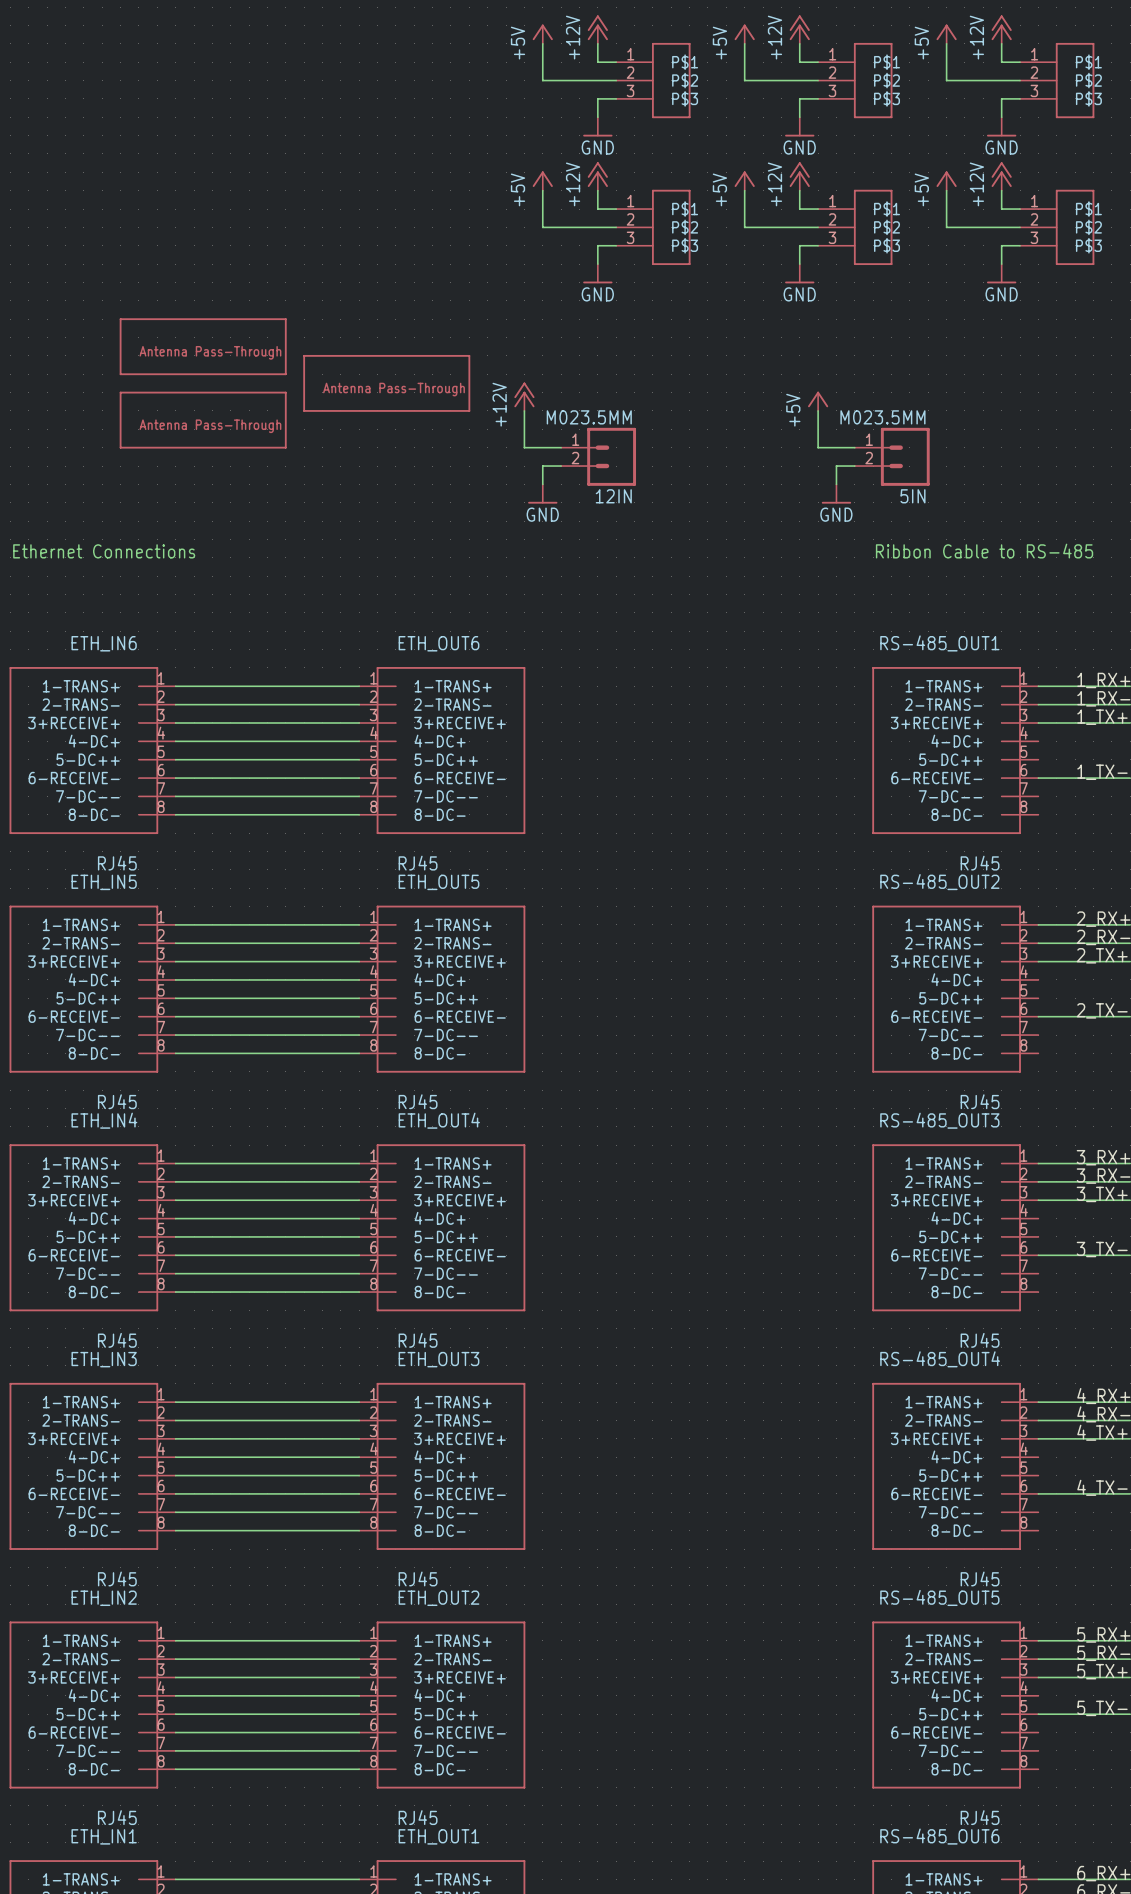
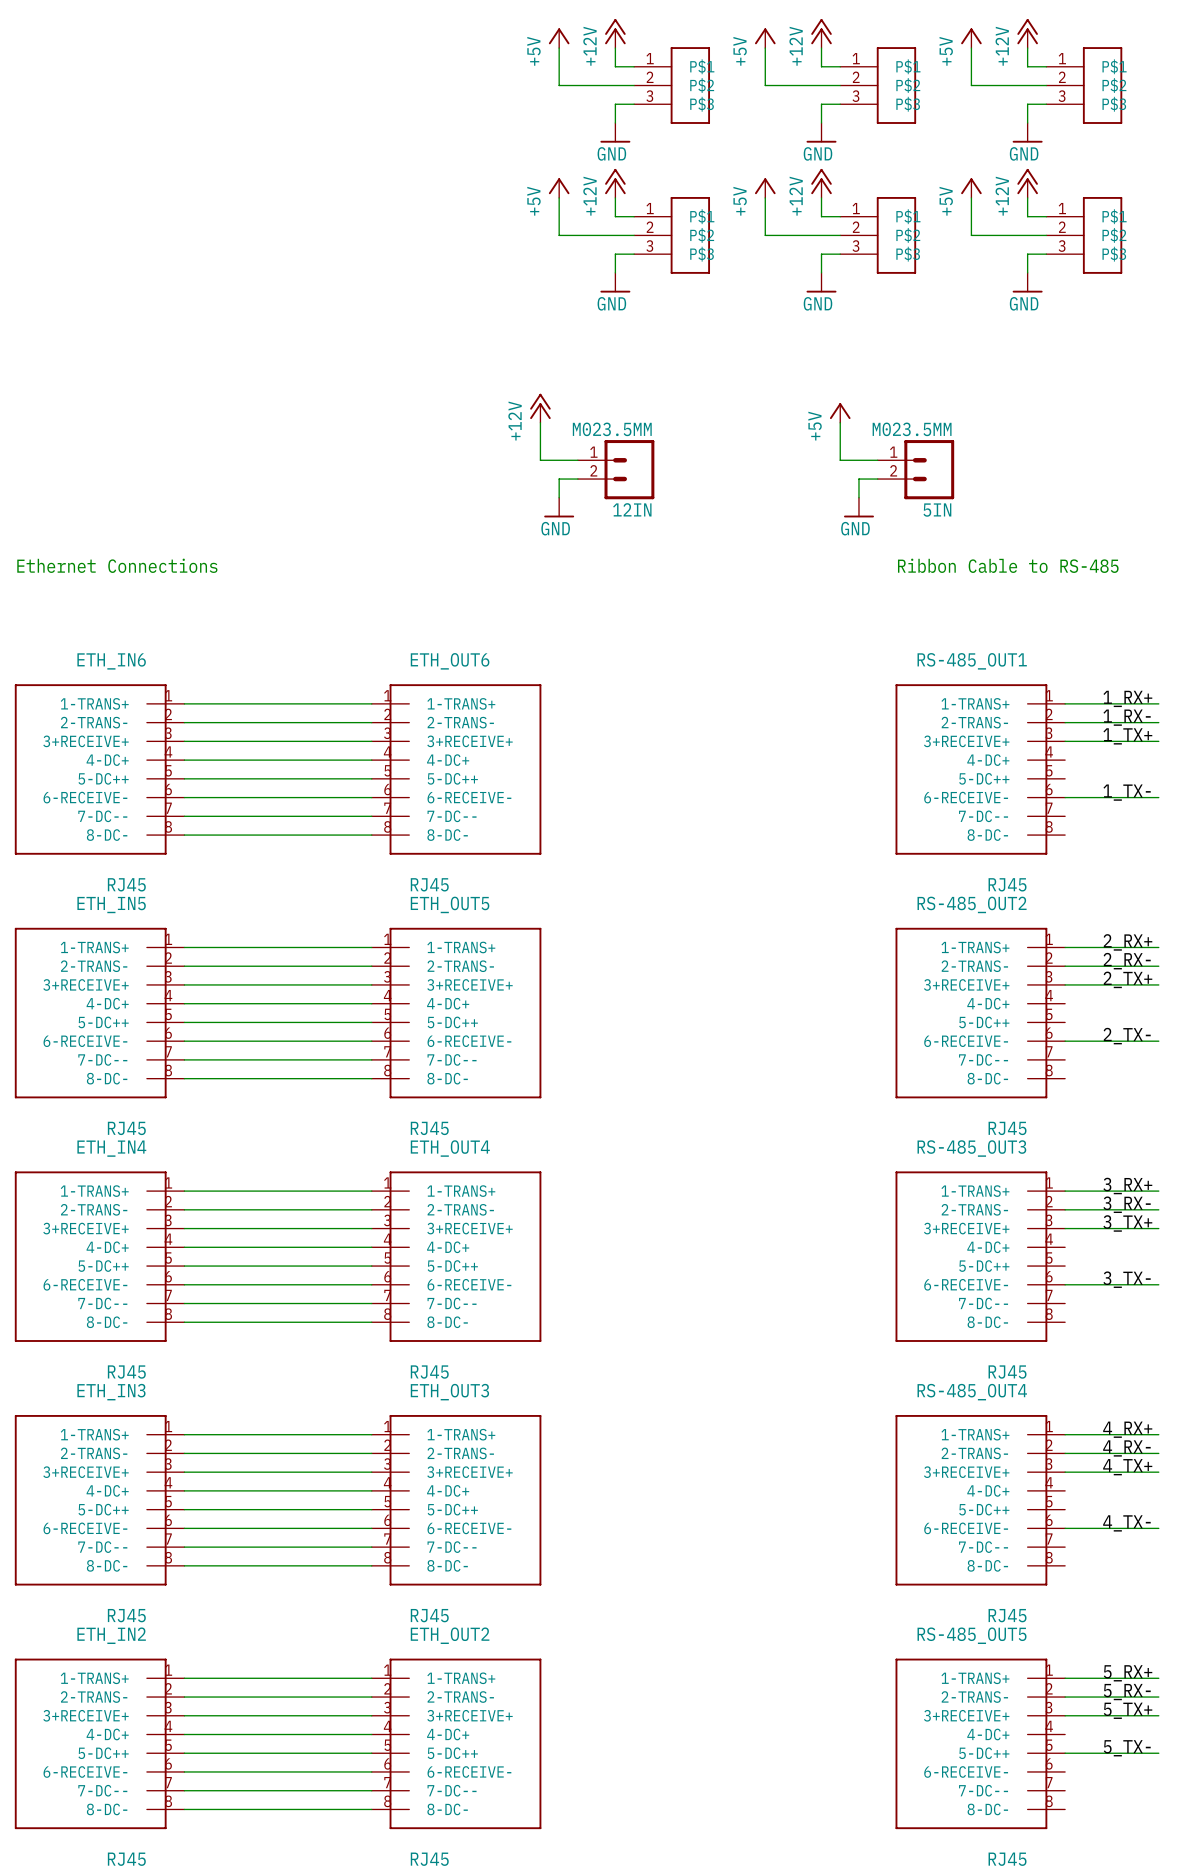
part: (203, 346) -> none
part: (386, 383) -> none
part: (203, 420) -> none

